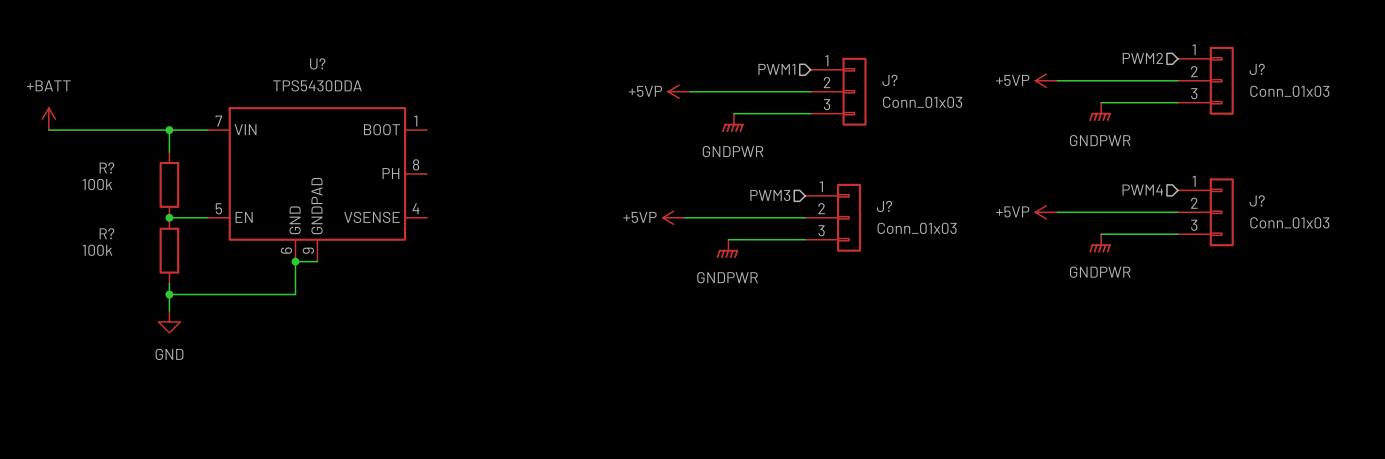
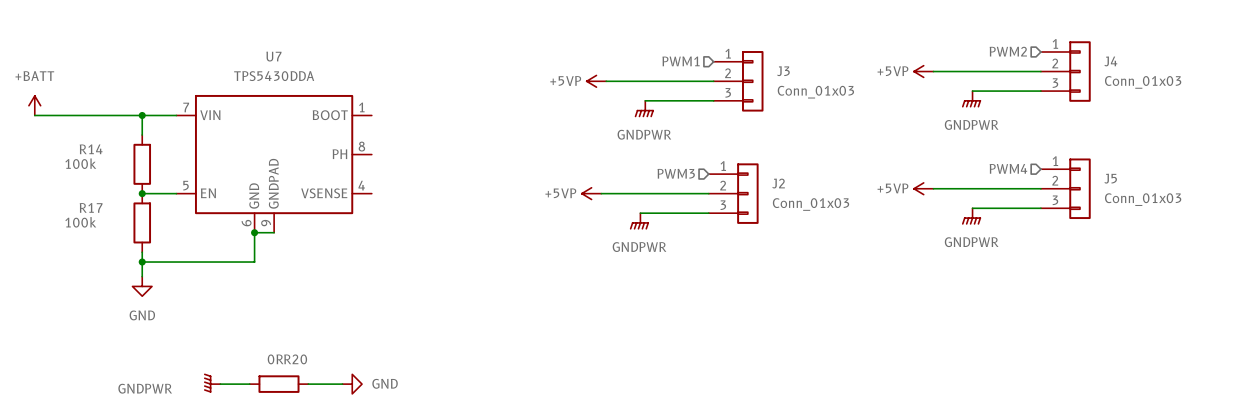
U? name: U? (317, 63) -> U7 (273, 56)
J? name: J? (1257, 69) -> J4 (1110, 61)
J? name: J? (889, 80) -> J3 (783, 71)
R? name: R? (106, 167) -> R14 (91, 149)
J? name: J? (1257, 200) -> J5 (1110, 178)
J? name: J? (884, 206) -> J2 (778, 183)
R? name: R? (106, 233) -> R17 (91, 207)
power symbol: none -> GNDPWR (212, 383)
wire: none -> (220, 384) (249, 384)
R20: none -> 0R (278, 384)
wire: none -> (308, 384) (342, 384)
power symbol: none -> GND (352, 384)

